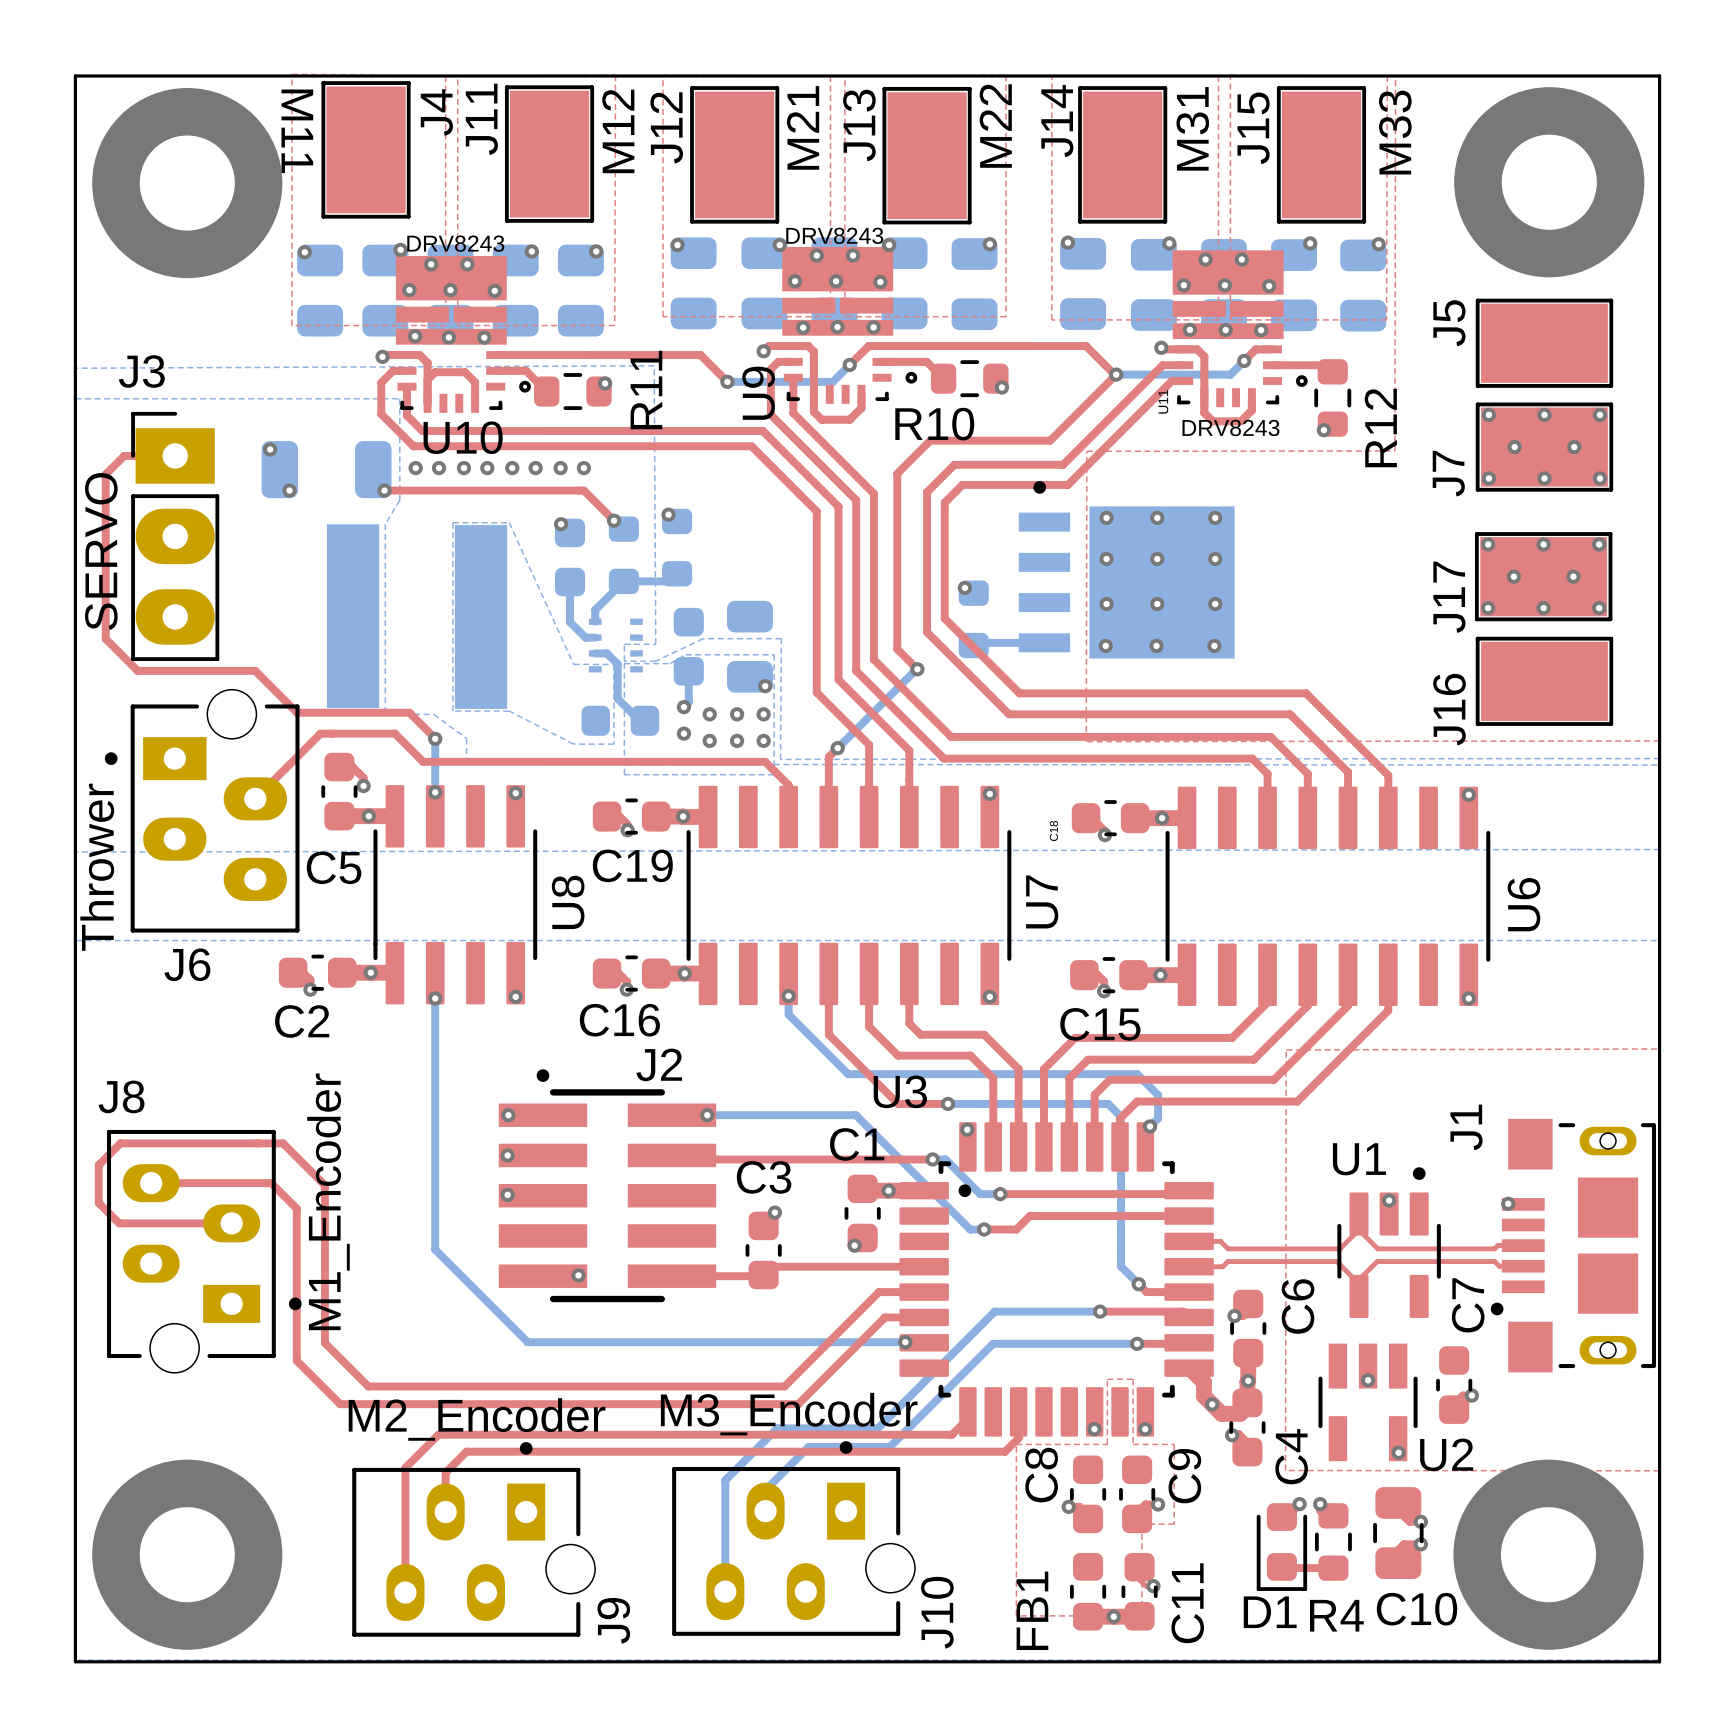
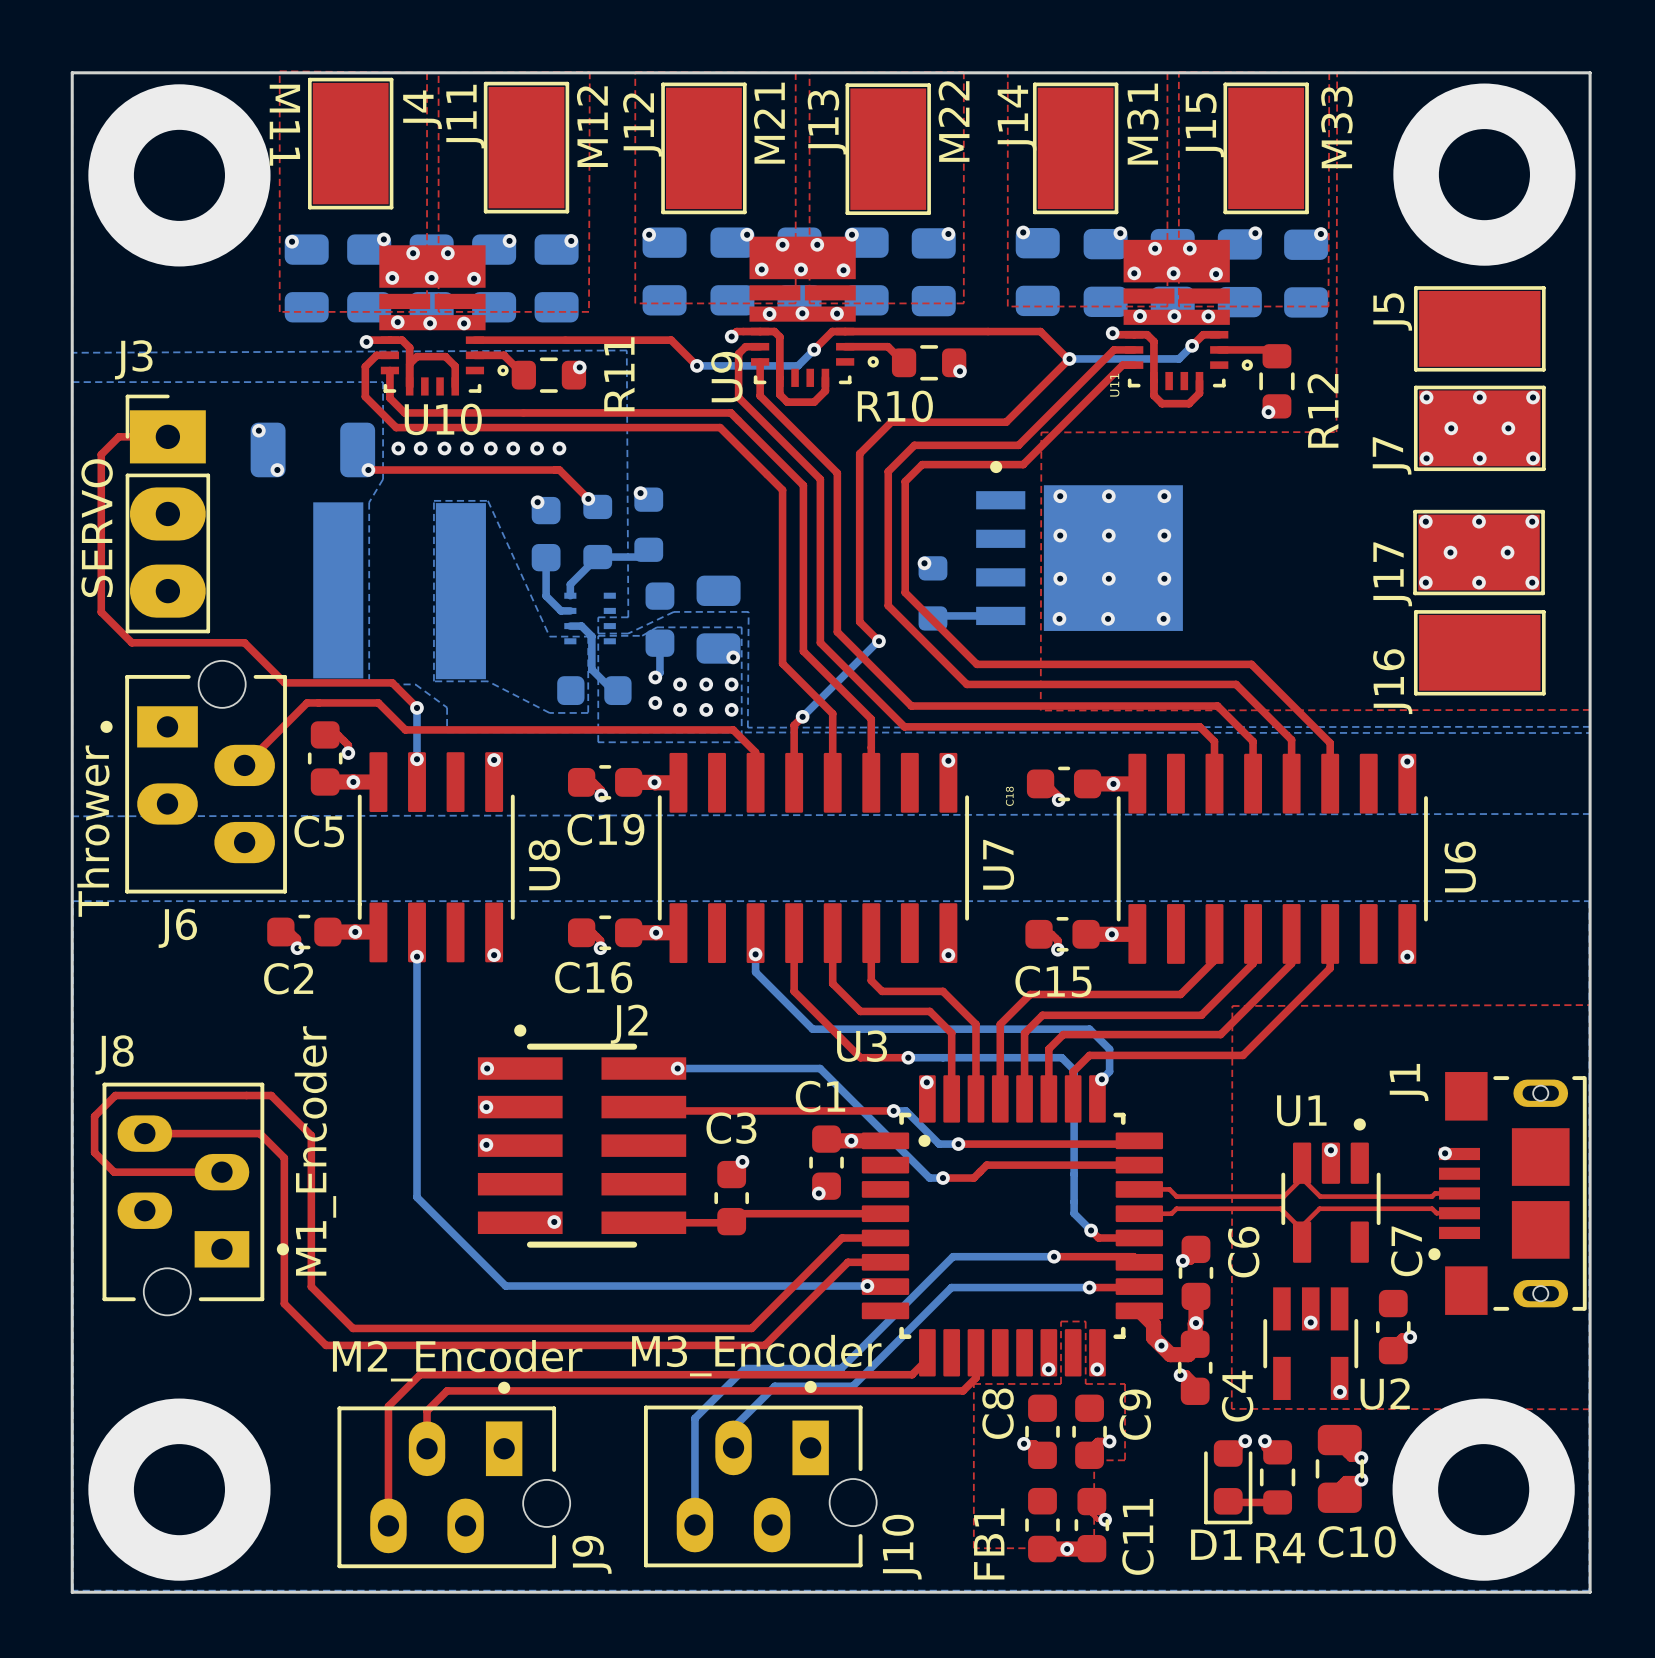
U9 value: DRV8243 (834, 235) -> none
U10 value: DRV8243 (455, 243) -> none
U11 value: DRV8243 (1230, 427) -> none

